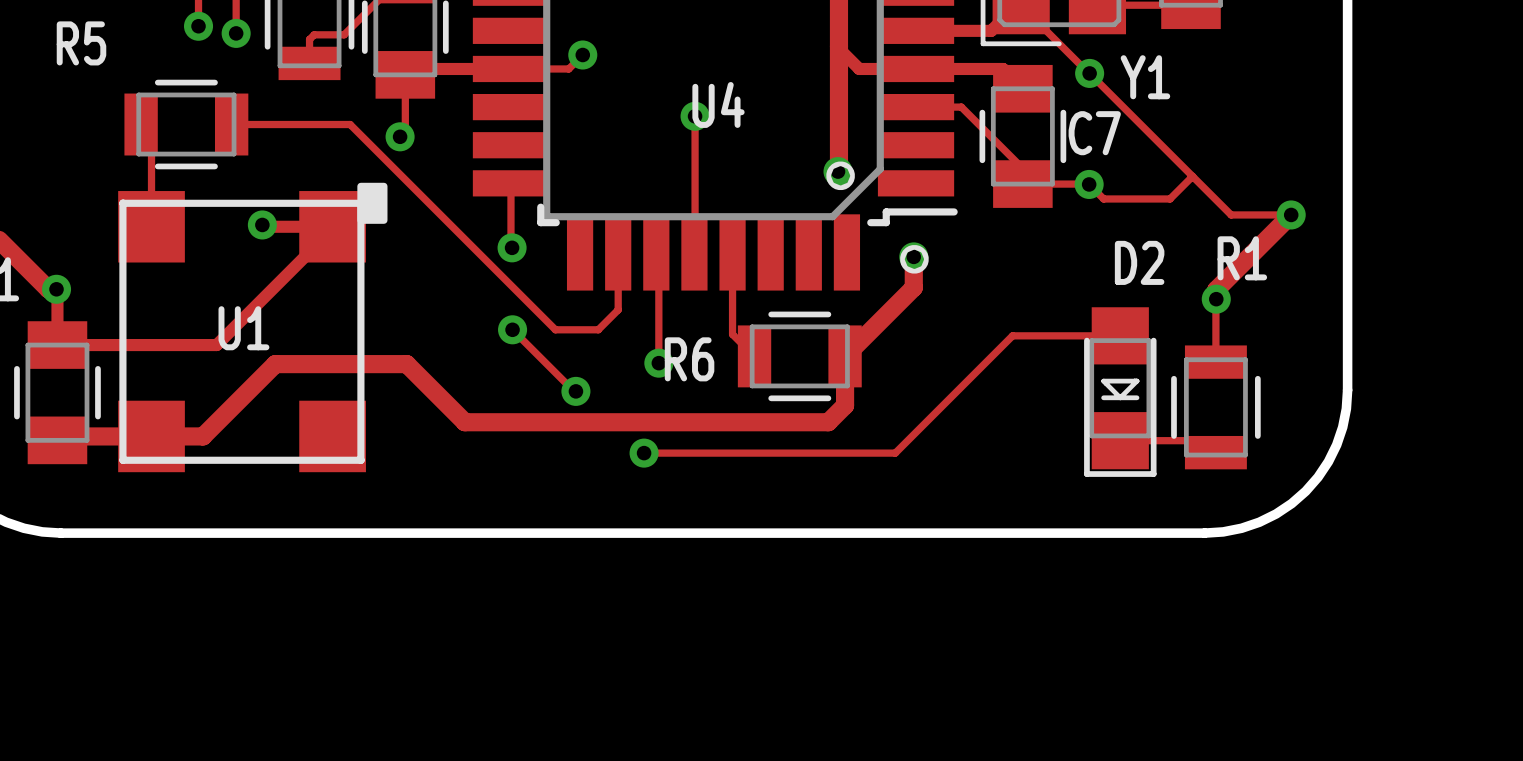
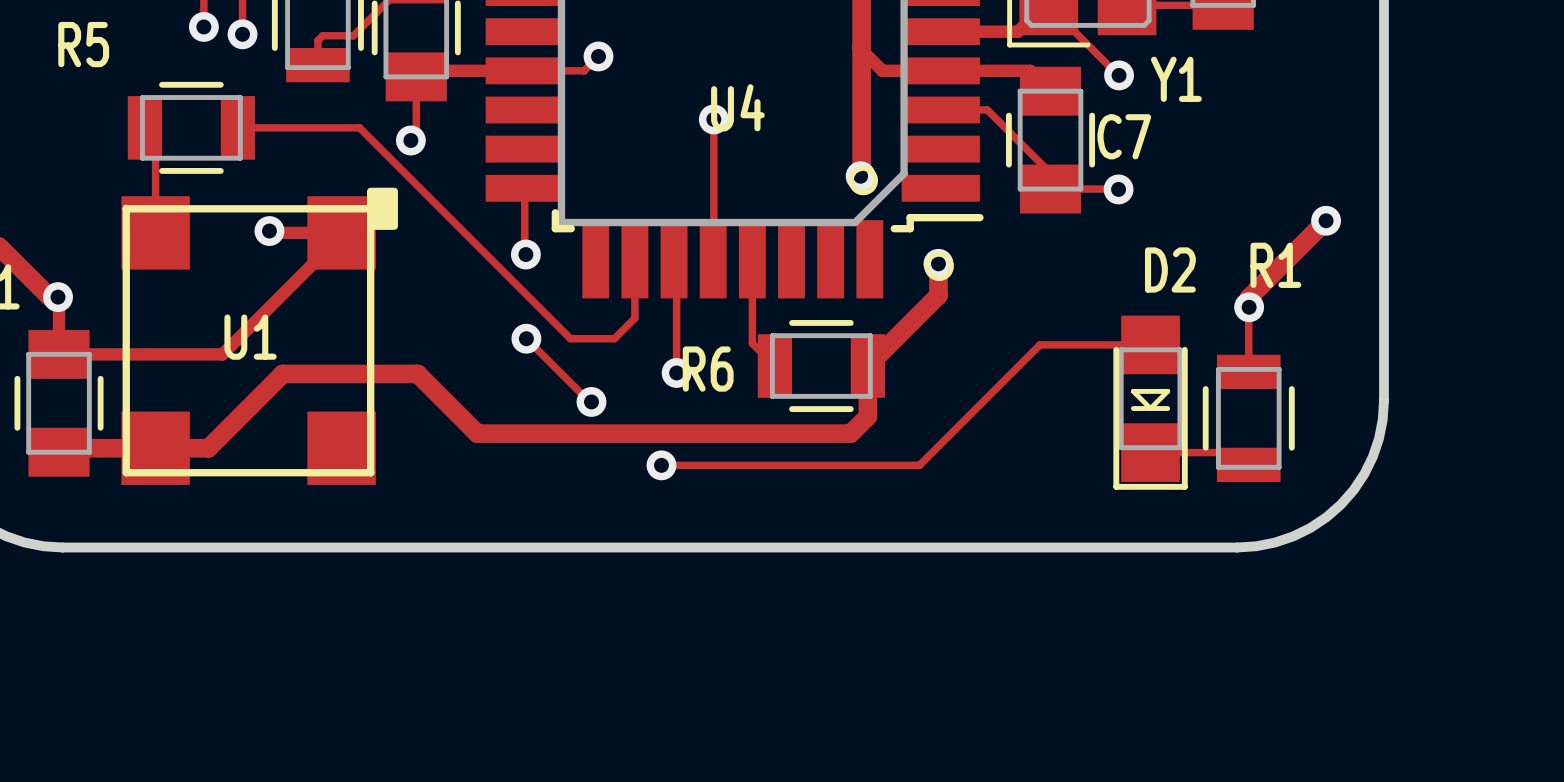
track: (1089, 73) (1231, 214) (1291, 214) -> none
track: (1192, 176) (1170, 198) (1103, 198) (1089, 184) -> none

